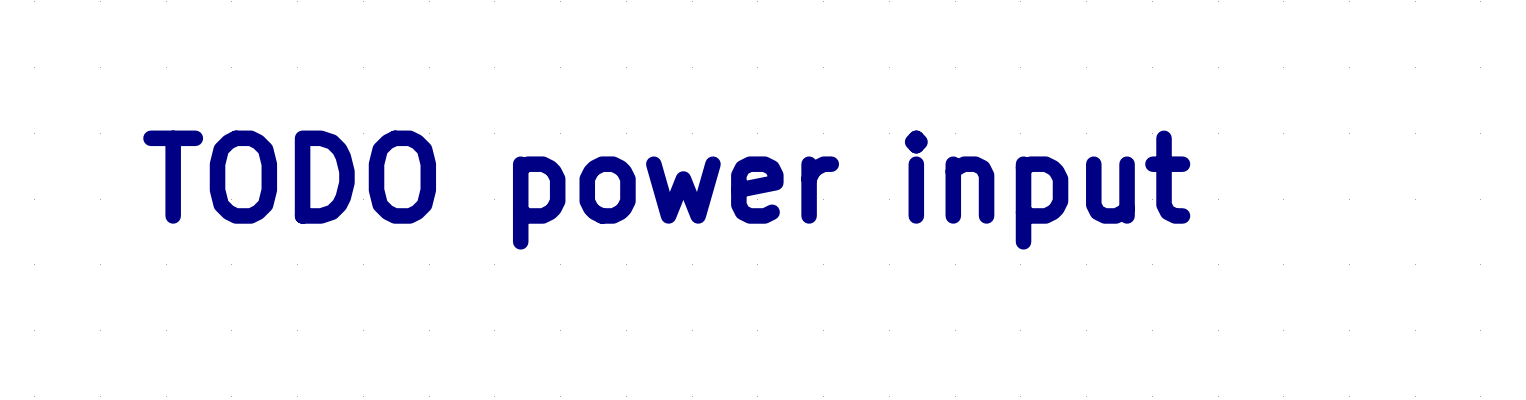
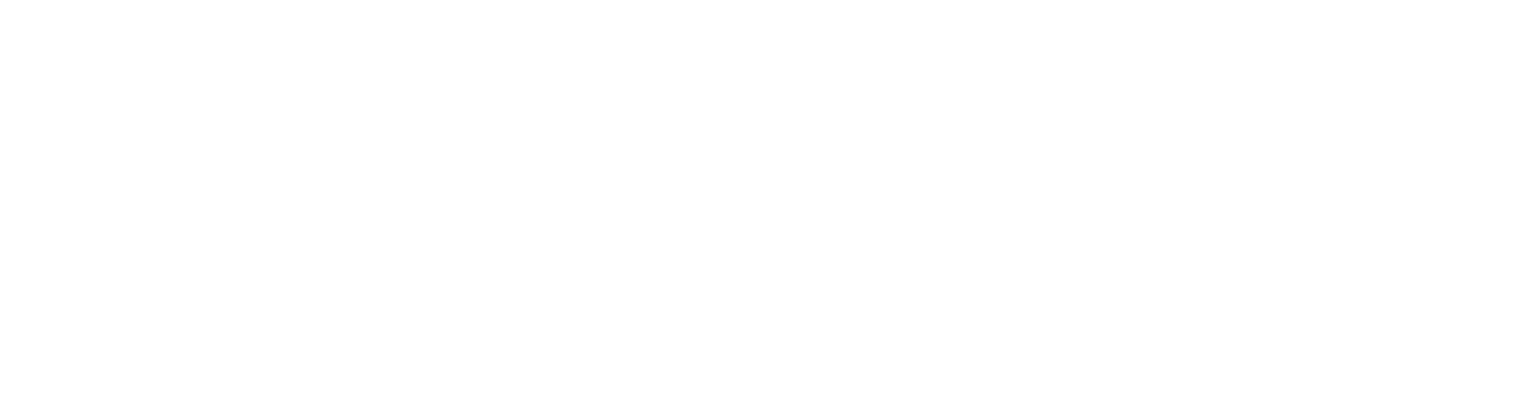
text: TODO power input (666, 190) -> none

